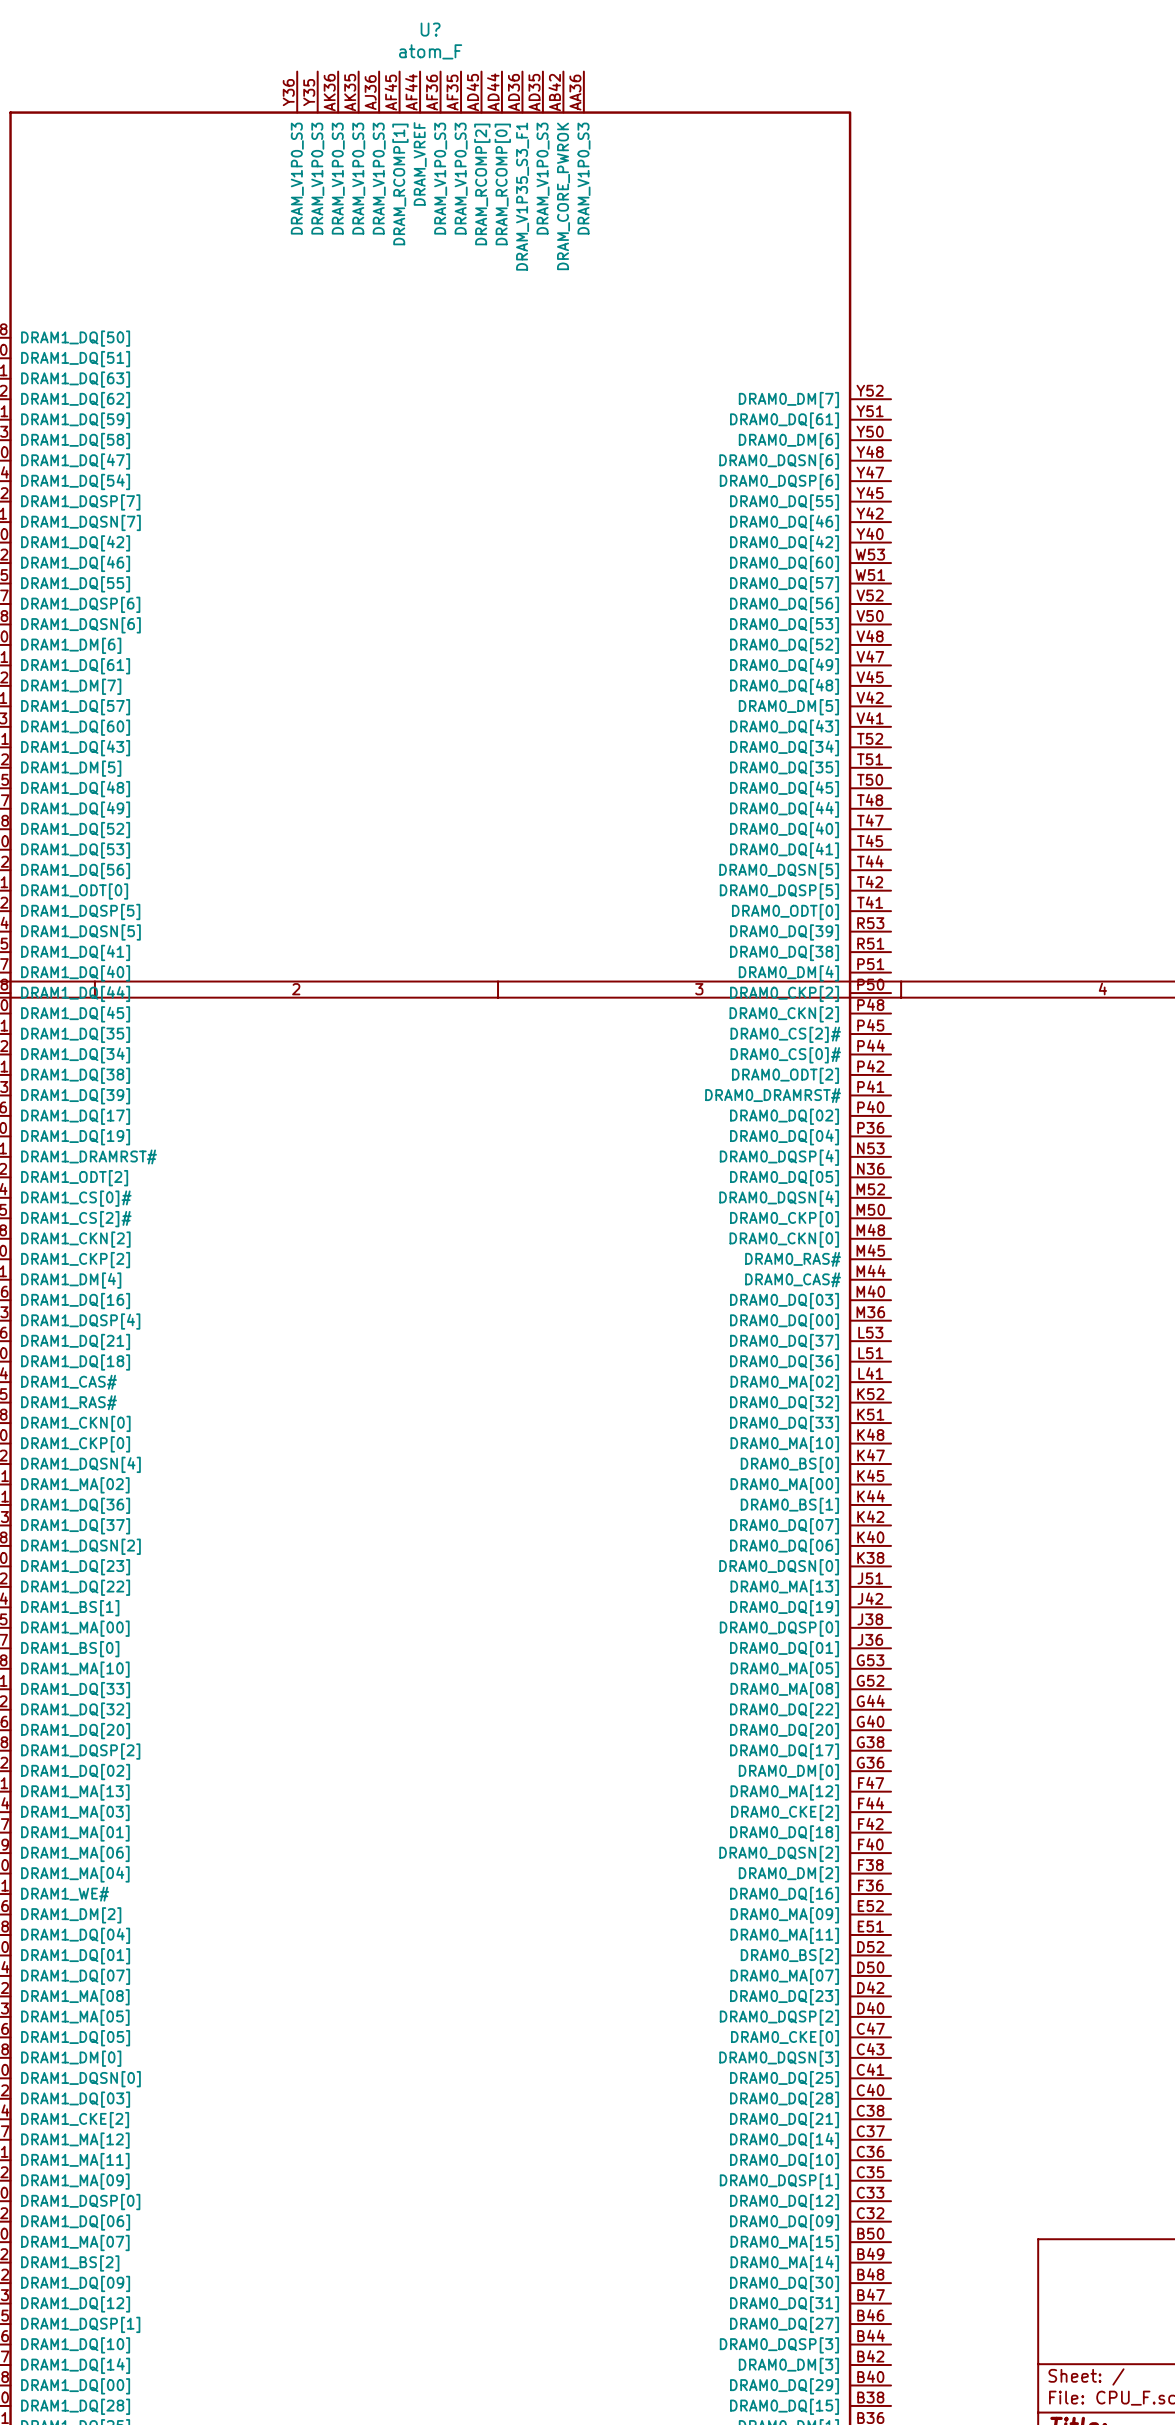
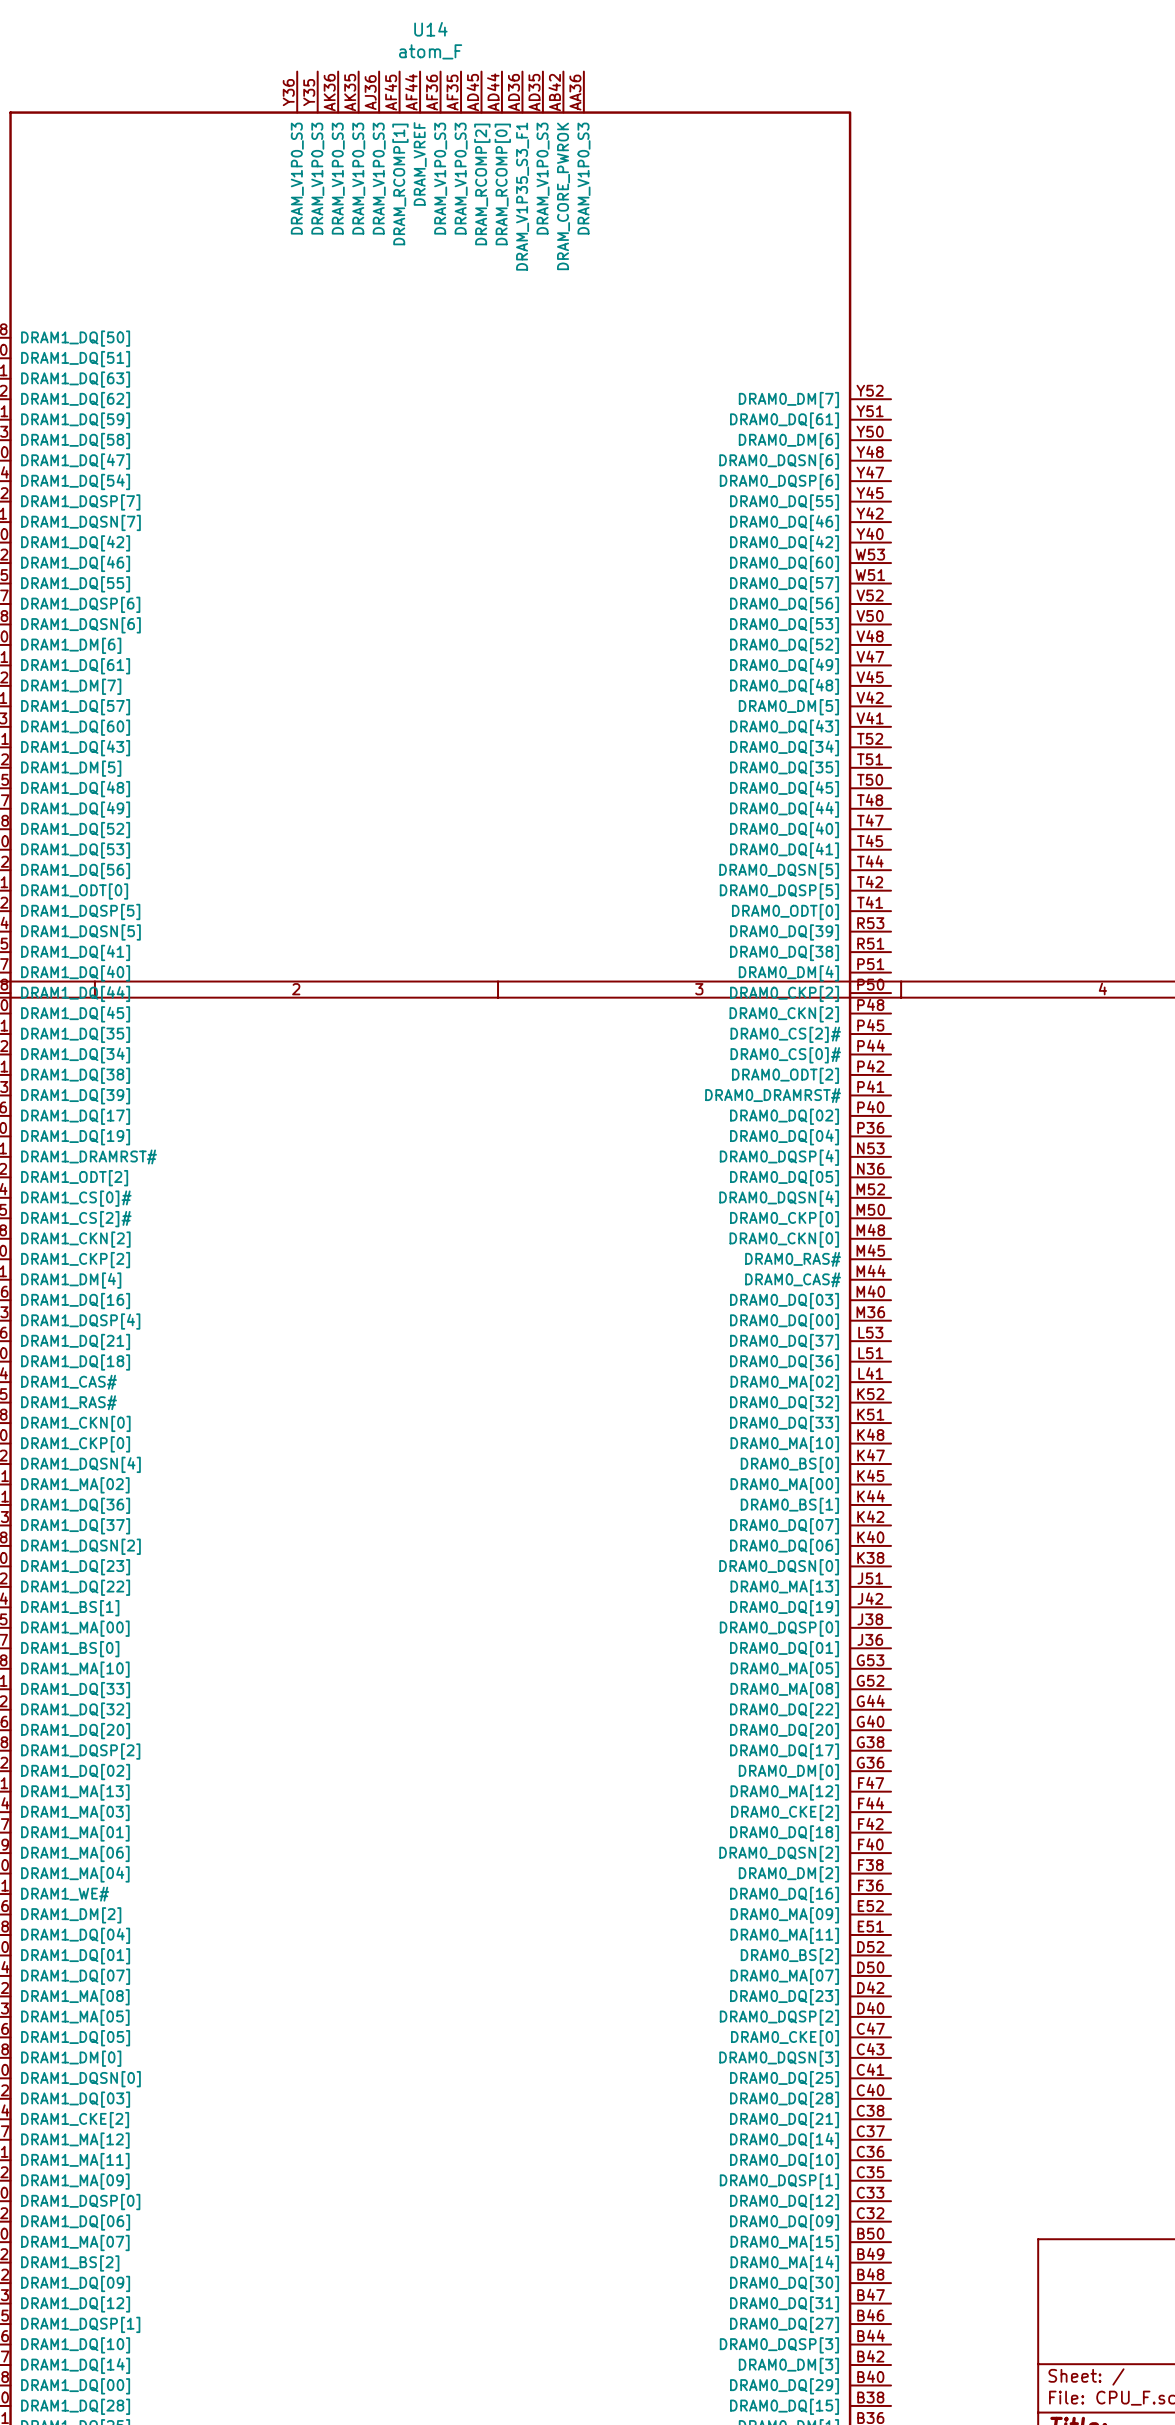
U? name: U? (430, 29) -> U14 (430, 29)

